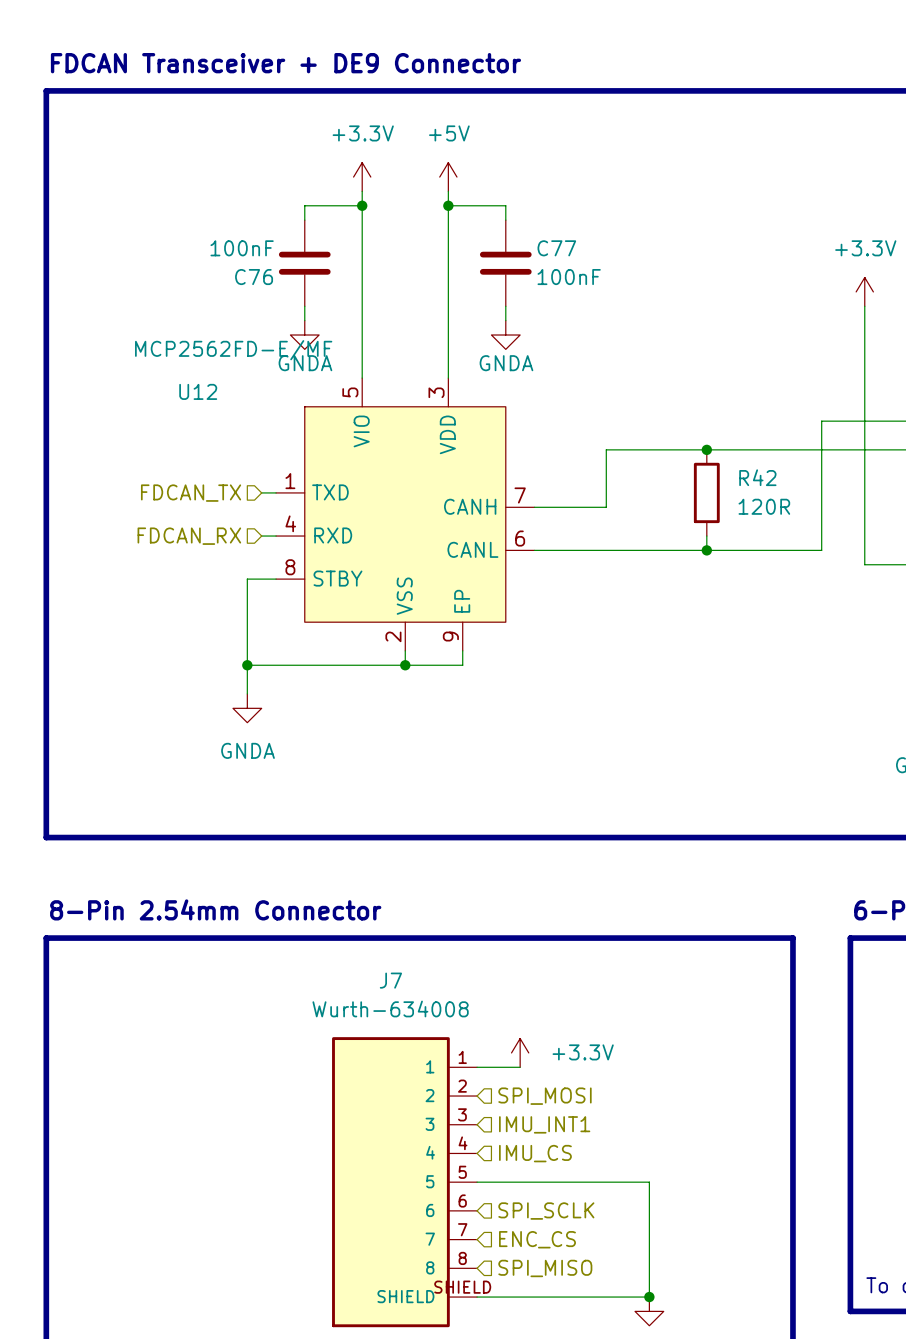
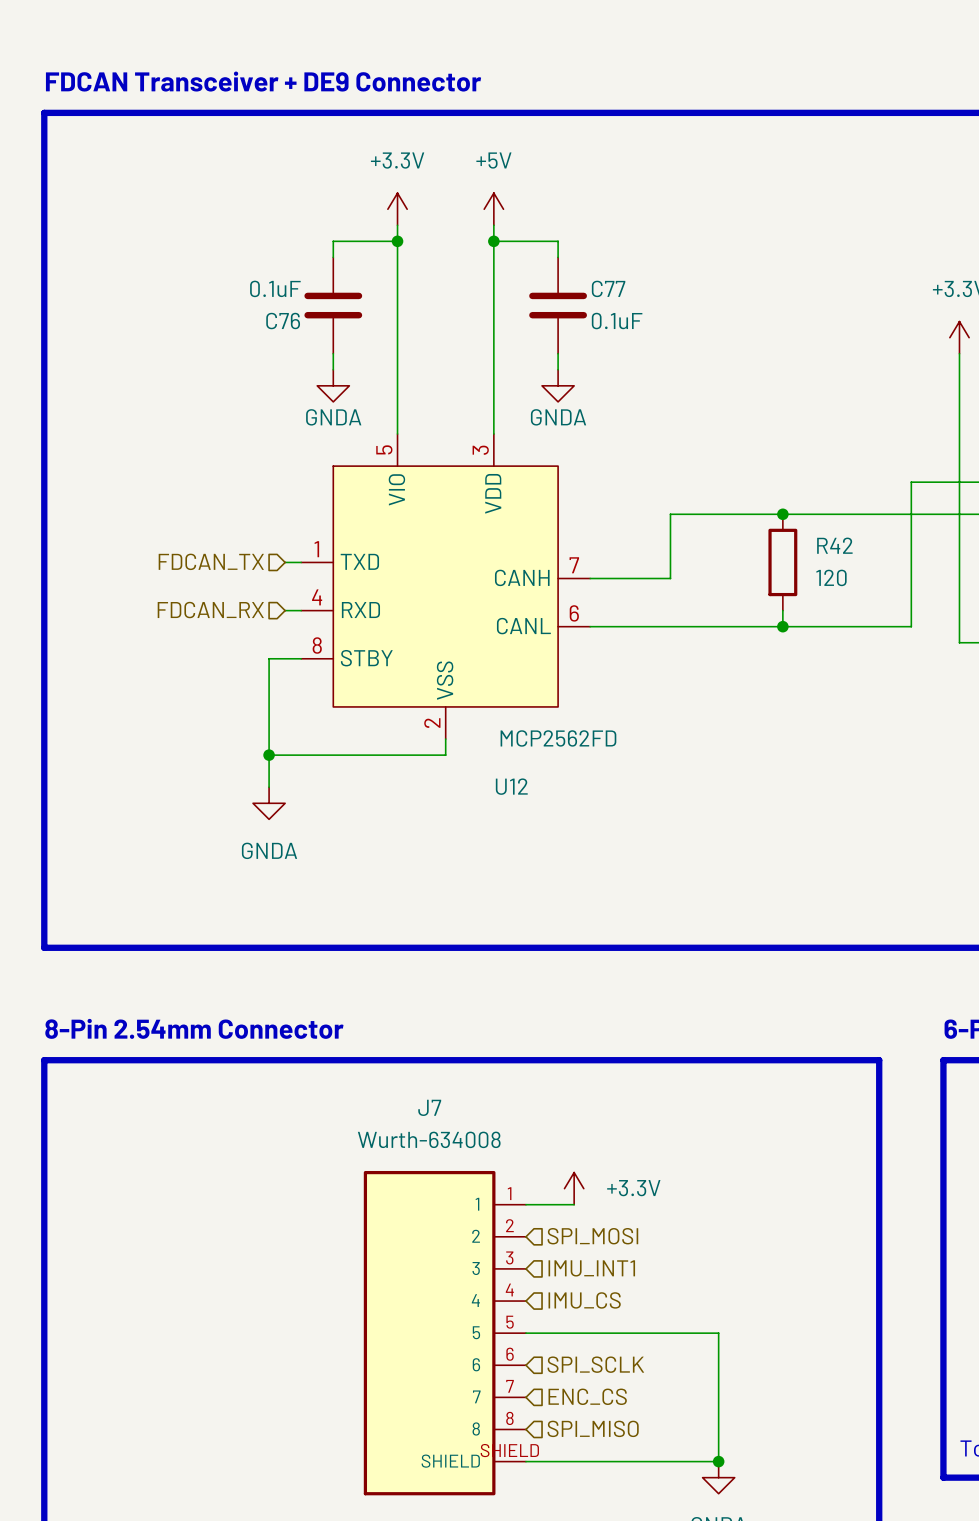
C76 value: 100nF (242, 248) -> 0.1uF (275, 288)
C77 value: 100nF (569, 277) -> 0.1uF (617, 321)
U12 value: MCP2562FD-E/MF (233, 350) -> MCP2562FD (558, 738)
U12 symbol: [276, 378, 535, 651] -> [301, 434, 591, 740]
U12 name position: U12 (198, 391) -> U12 (511, 786)
R42 value: 120R (764, 506) -> 120 (831, 577)
wire: (462, 650) (462, 665) (405, 665) -> none
junction: (405, 665) -> none

